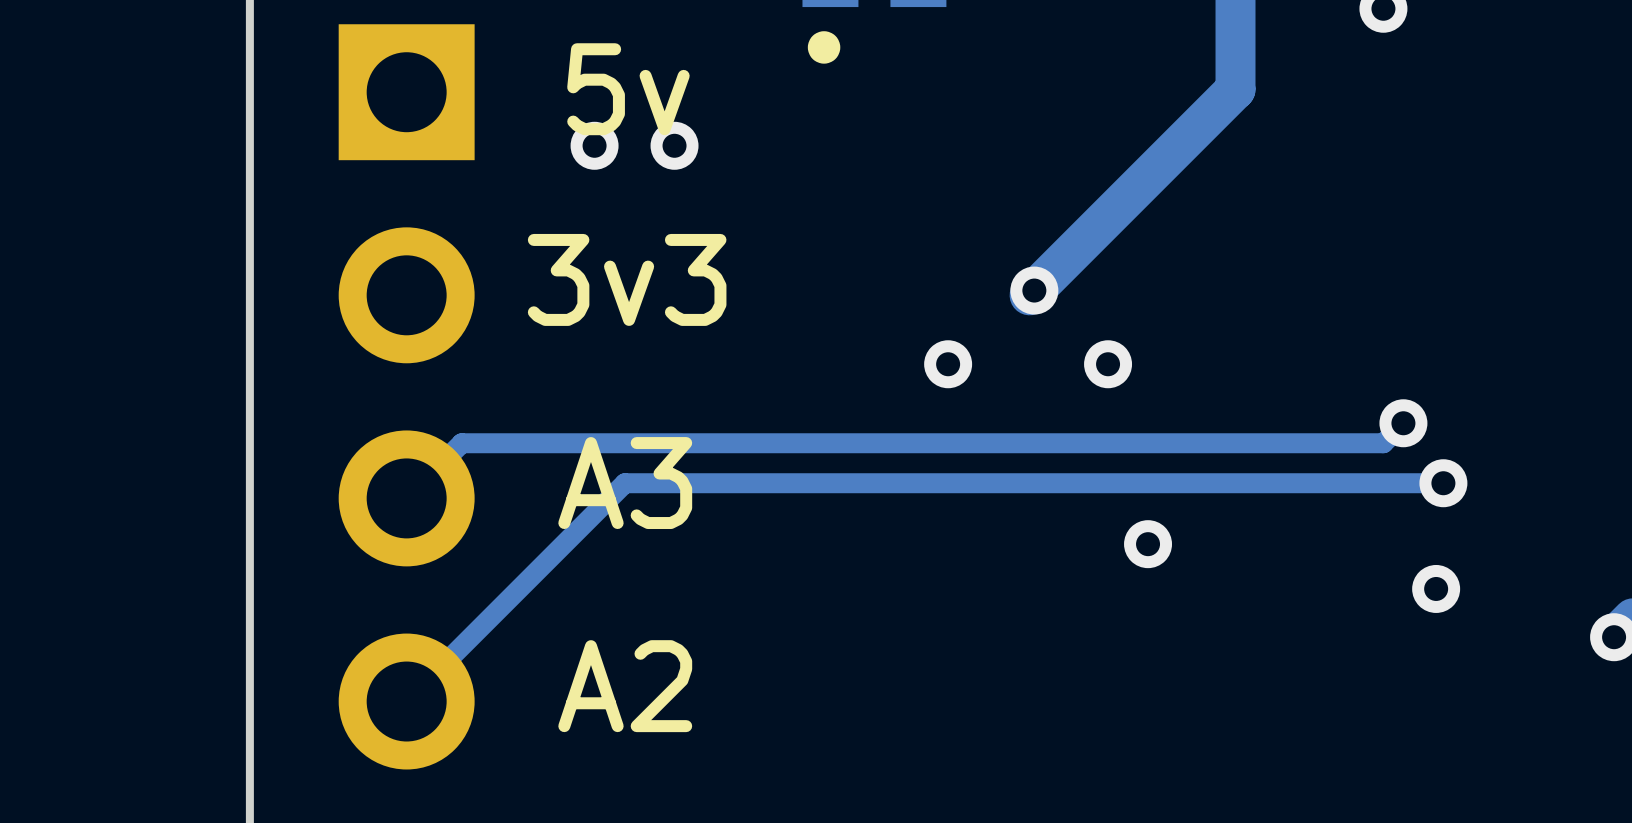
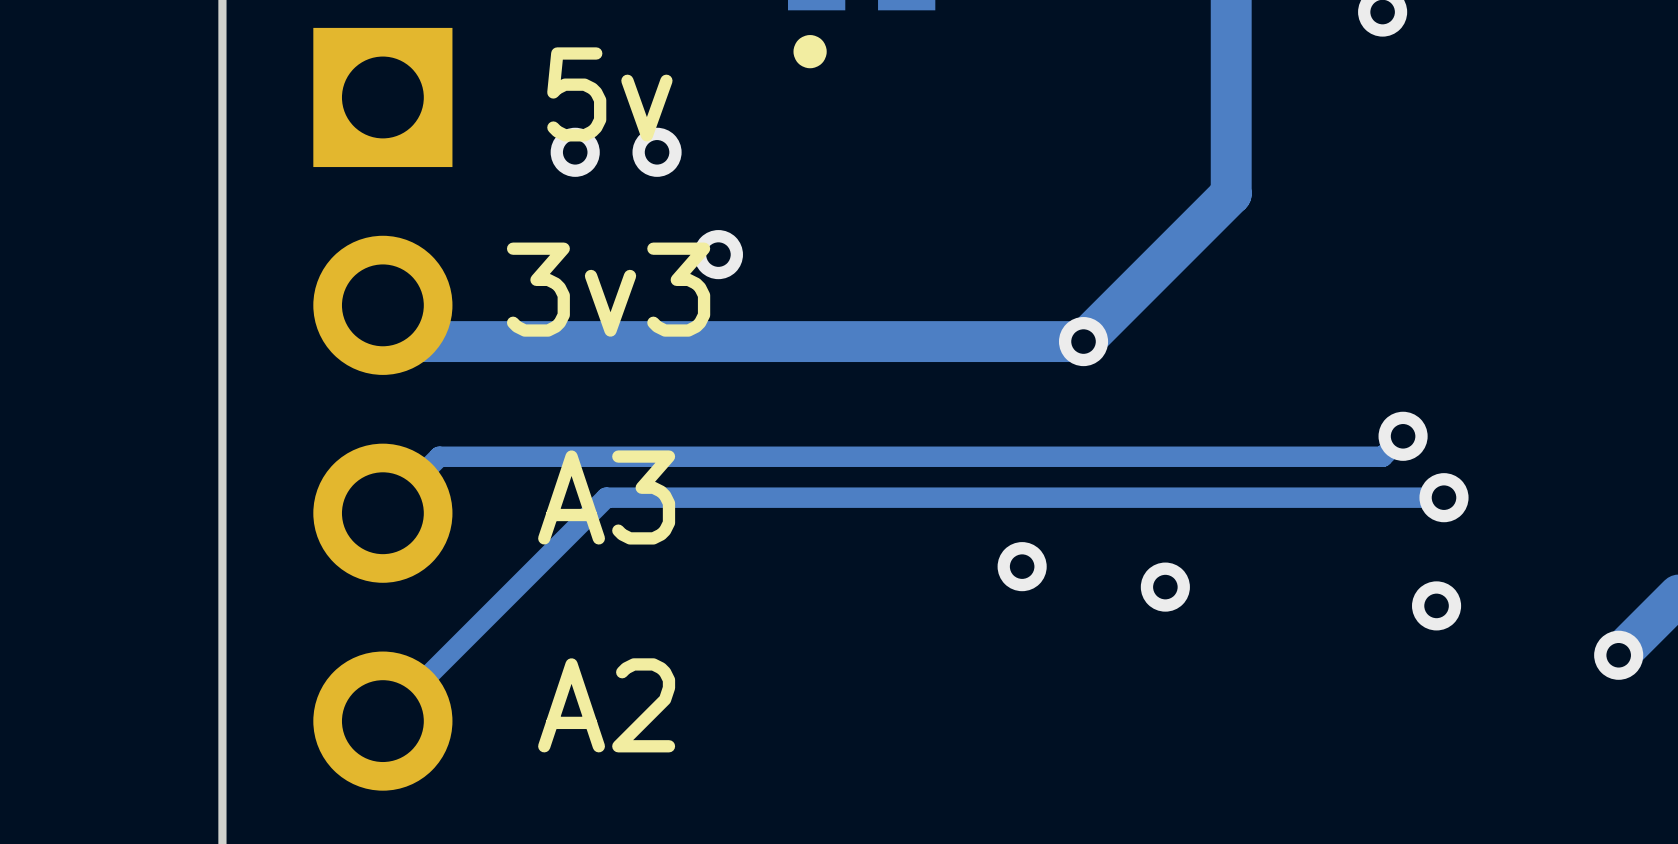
track: (1235, 89) (1029, 295) -> (1231, 94) (1231, 193) (1083, 341) (419, 341) (382, 305)
via: none -> (718, 254)
via: (1034, 290) -> none
via: (948, 364) -> none
via position: (1108, 364) -> (1083, 341)
via position: (1148, 544) -> (1165, 587)
via: none -> (1022, 566)

